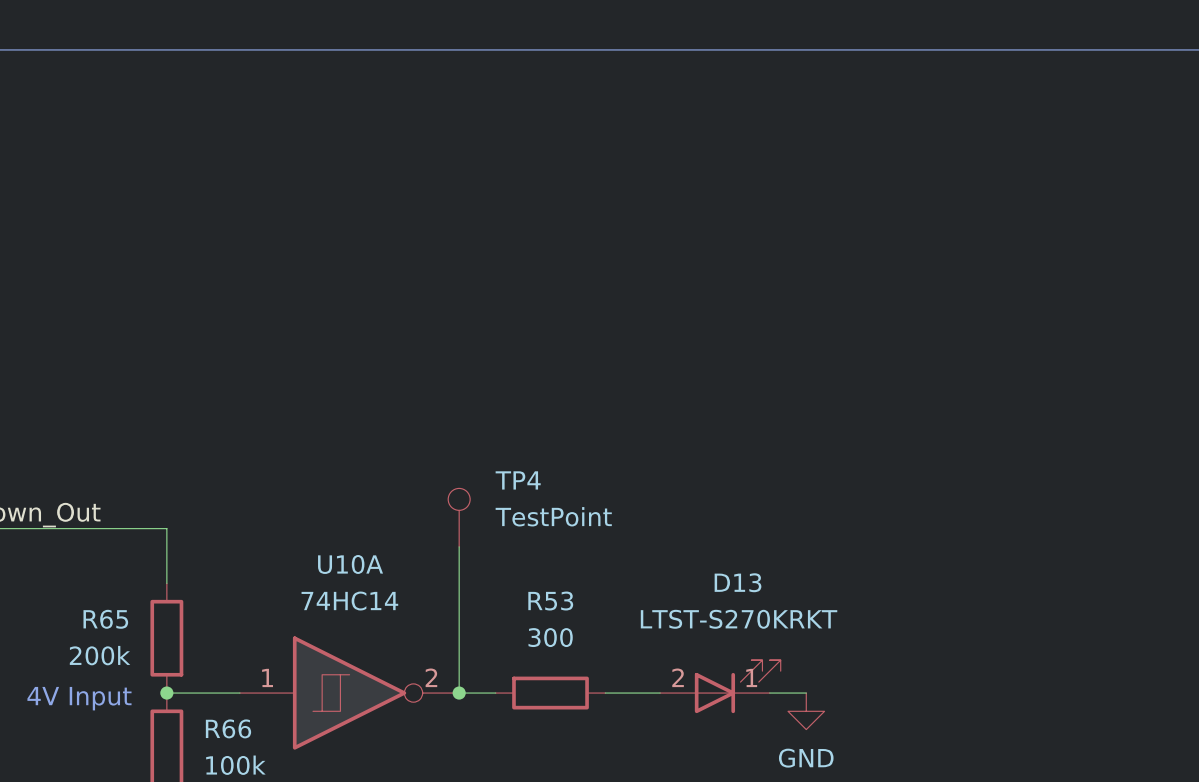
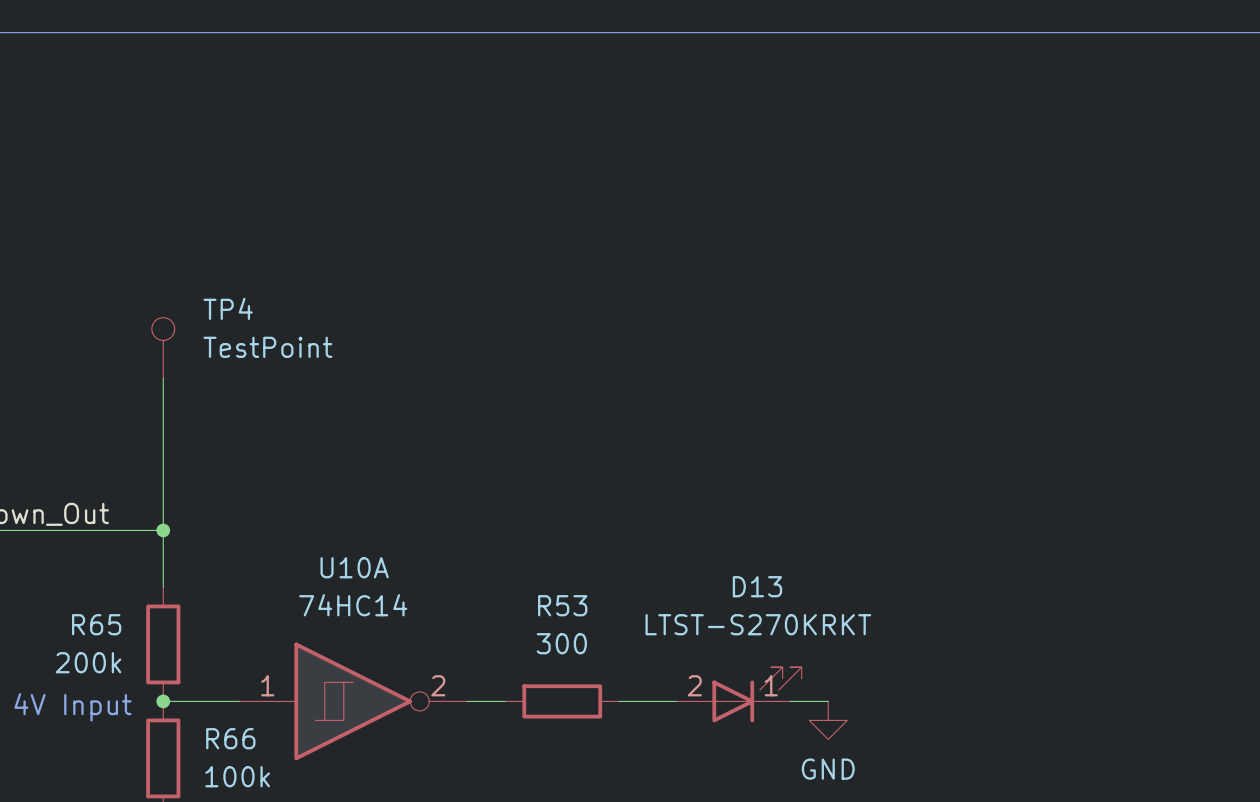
TP4 position: (459, 517) -> (163, 348)
junction: none -> (163, 530)
wire: (459, 546) (459, 693) -> (163, 378) (163, 530)
junction: (459, 693) -> none

